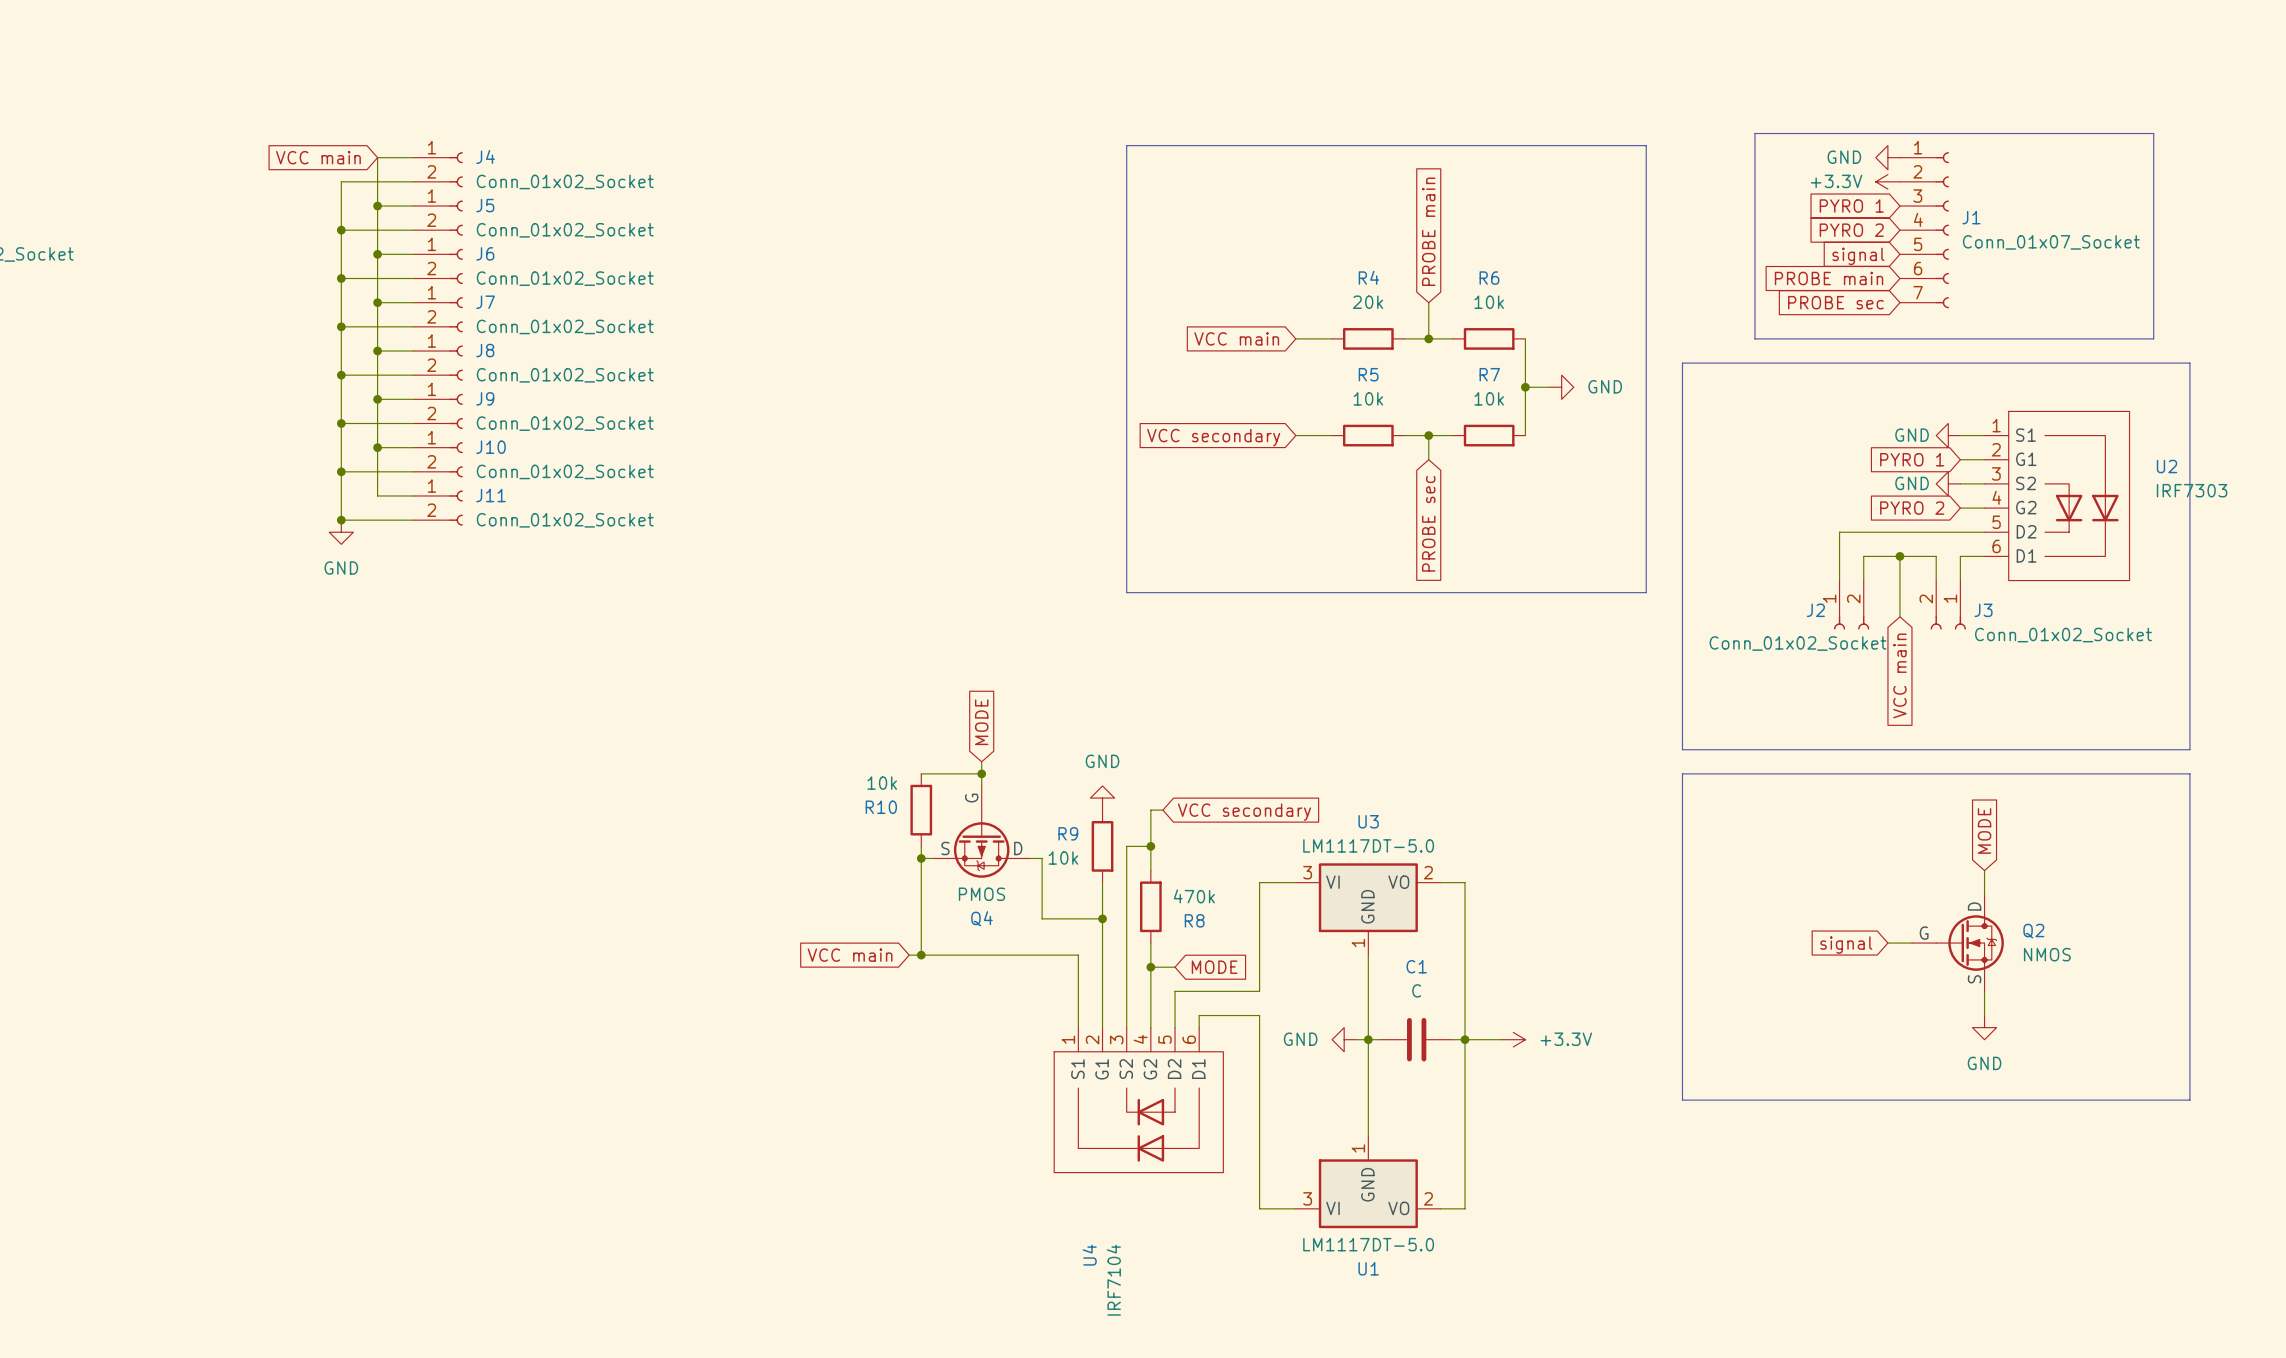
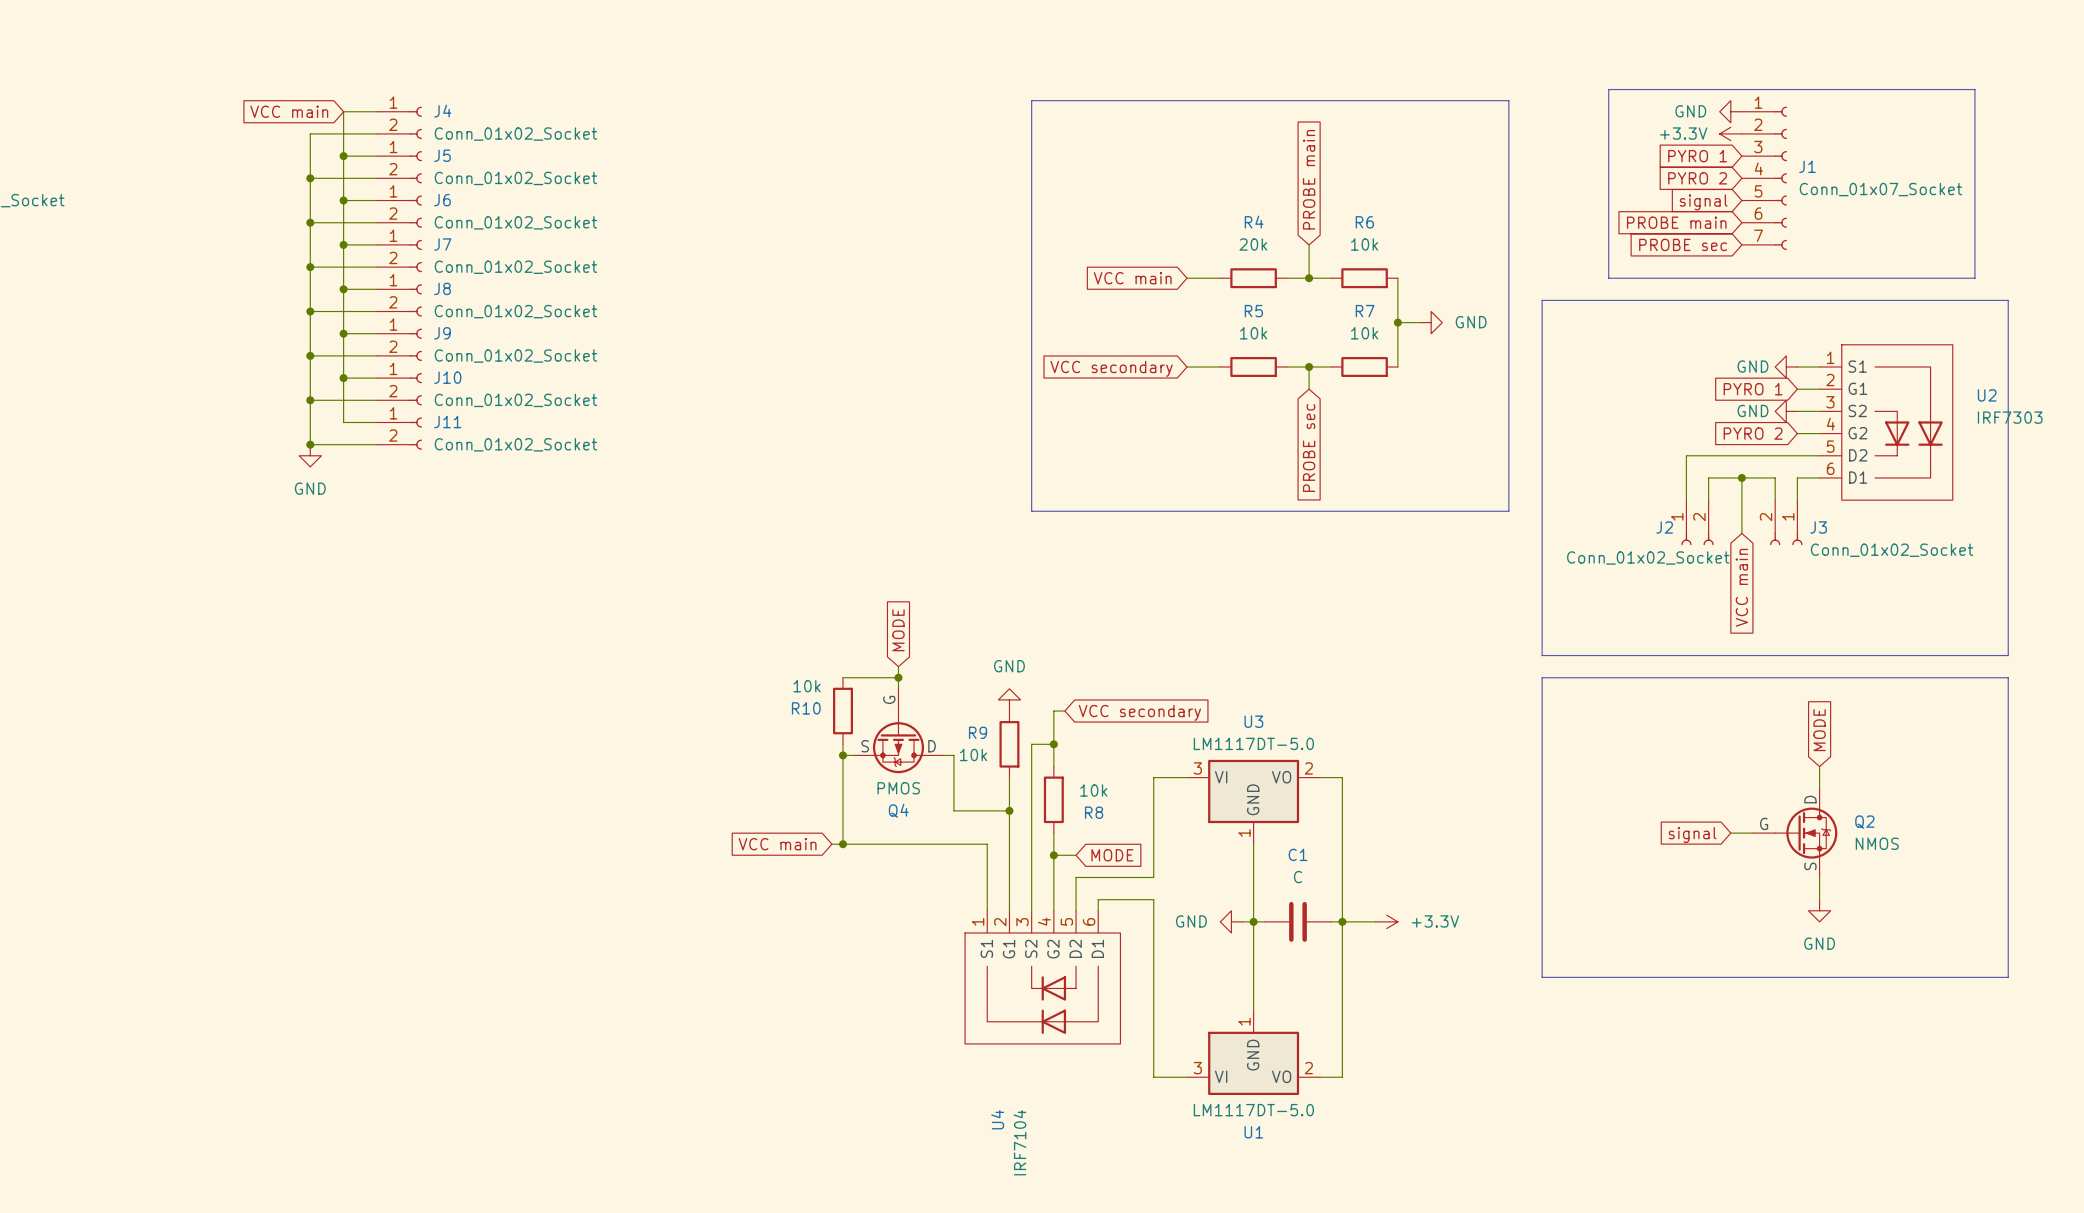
R8 value: 470k (1194, 896) -> 10k (1093, 790)

